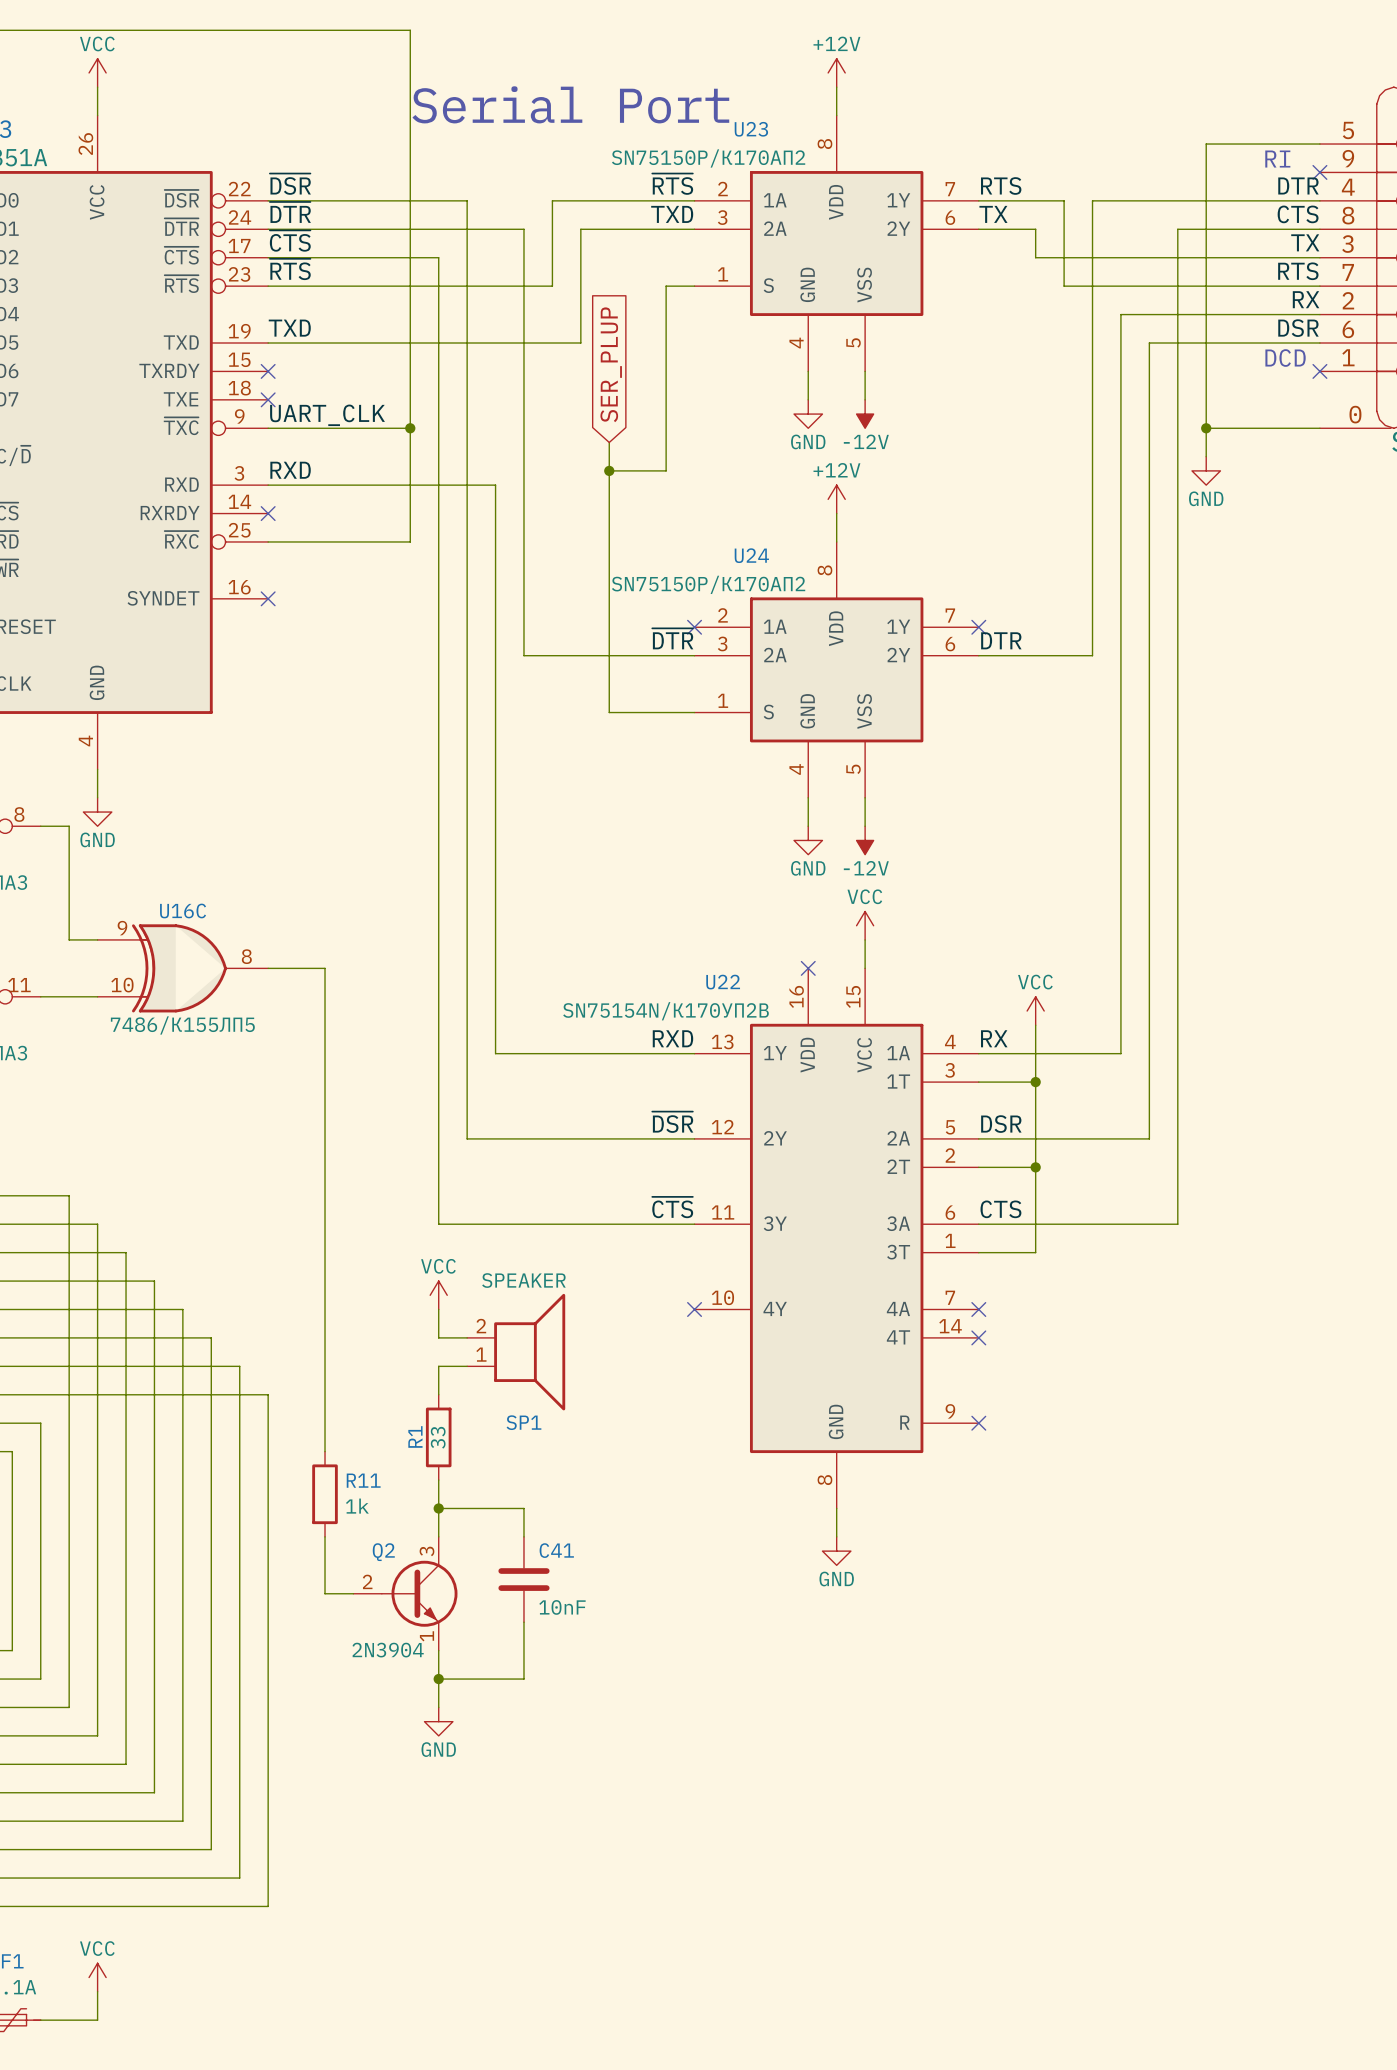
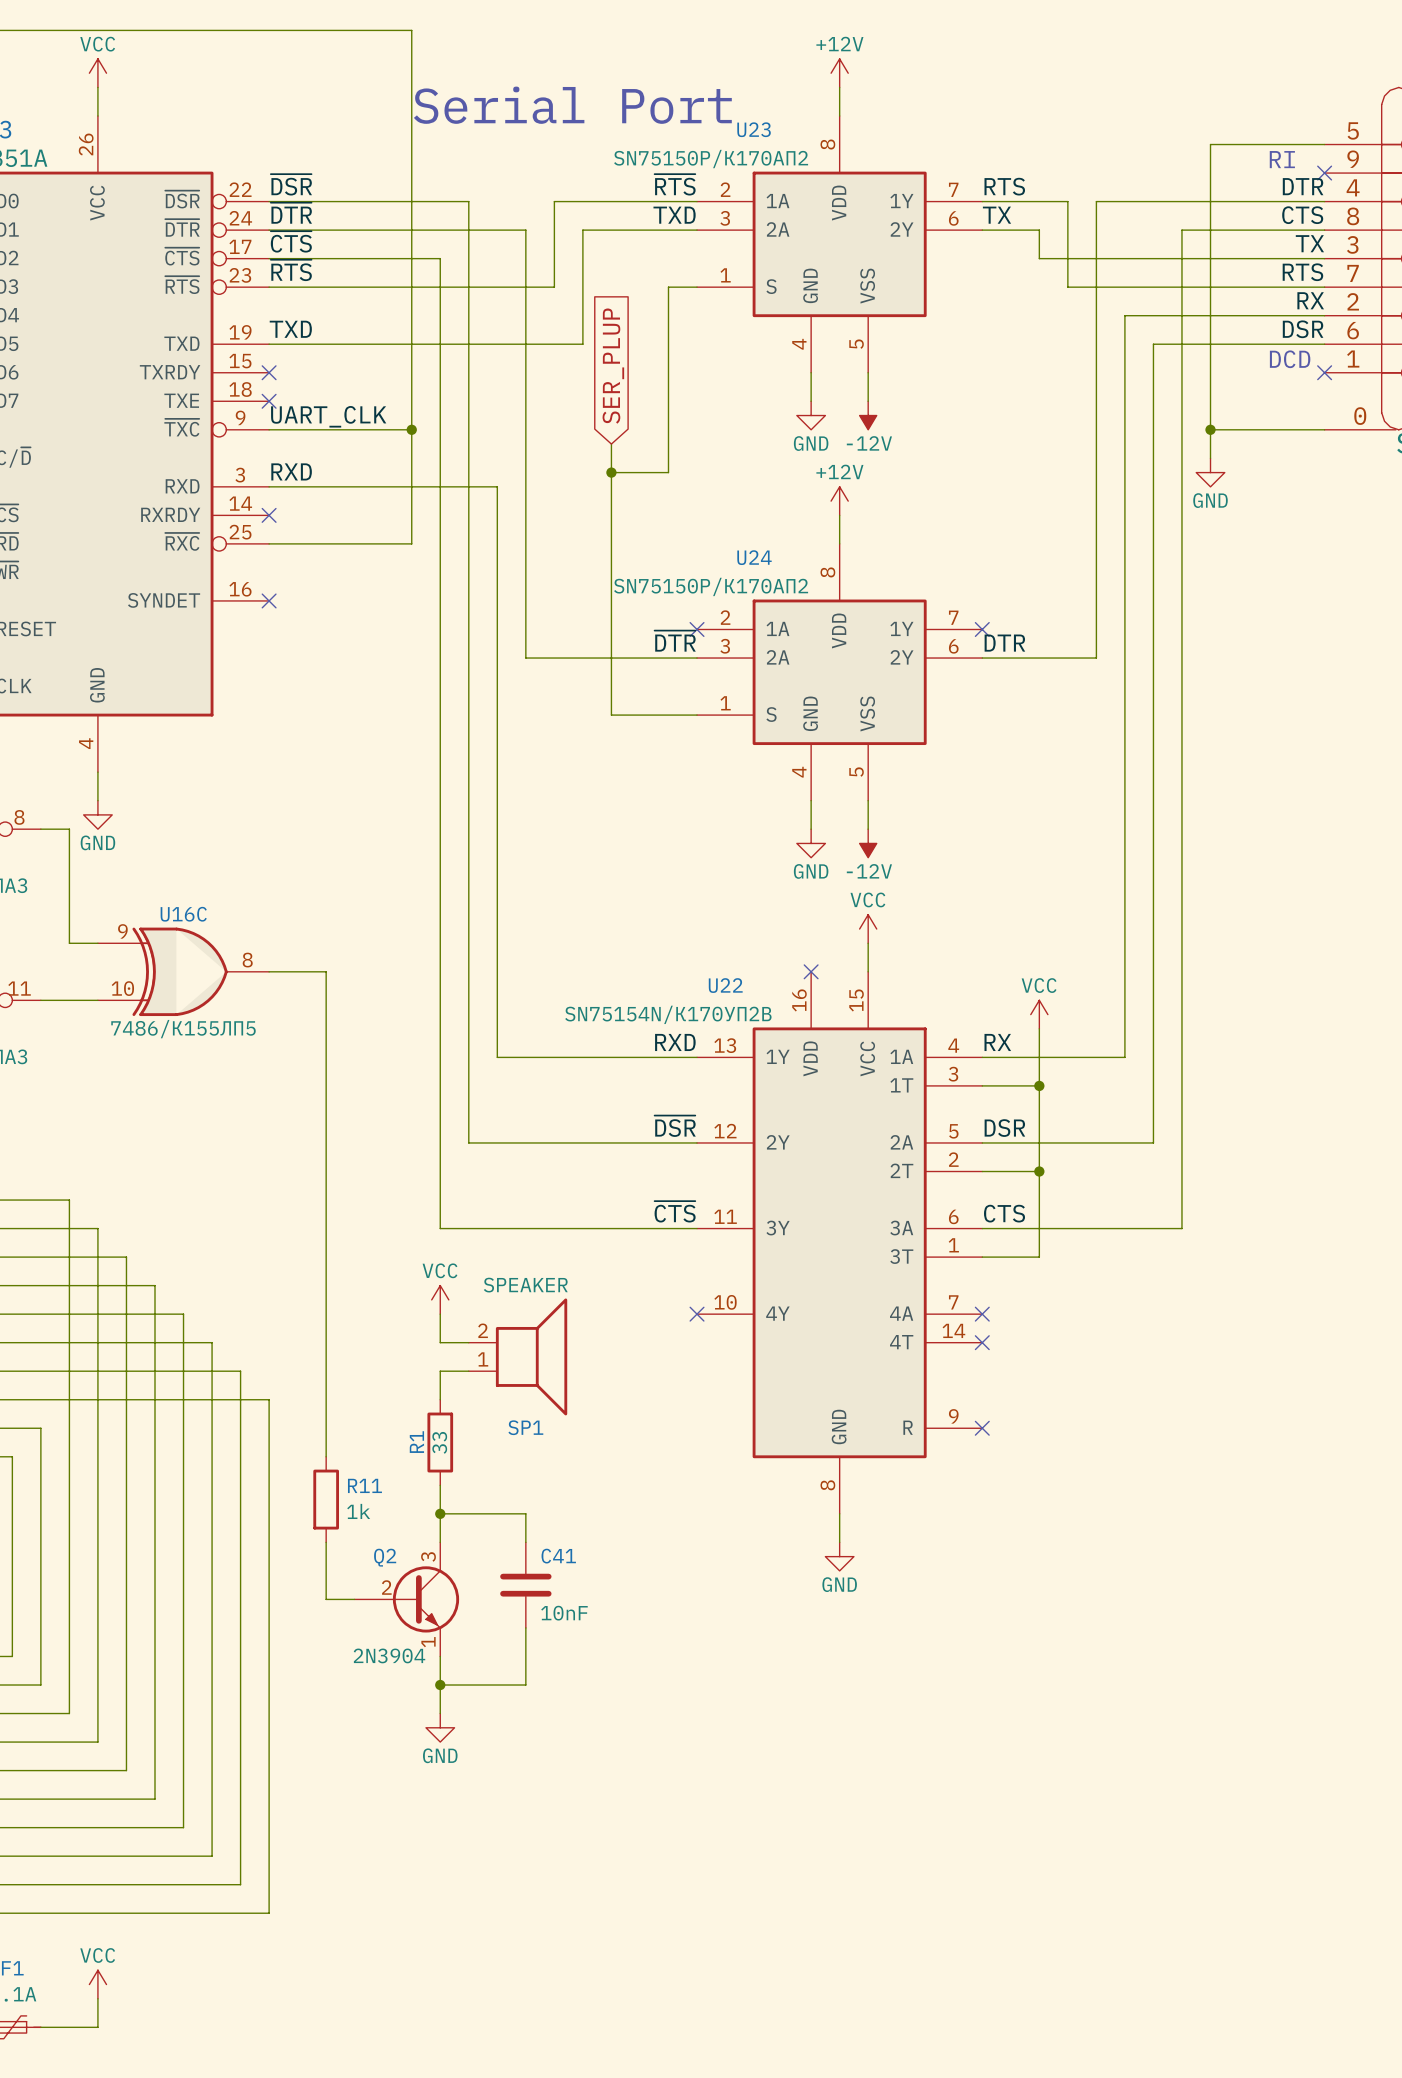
Q2 symbol: [353, 1536, 458, 1651] -> [354, 1542, 460, 1657]

